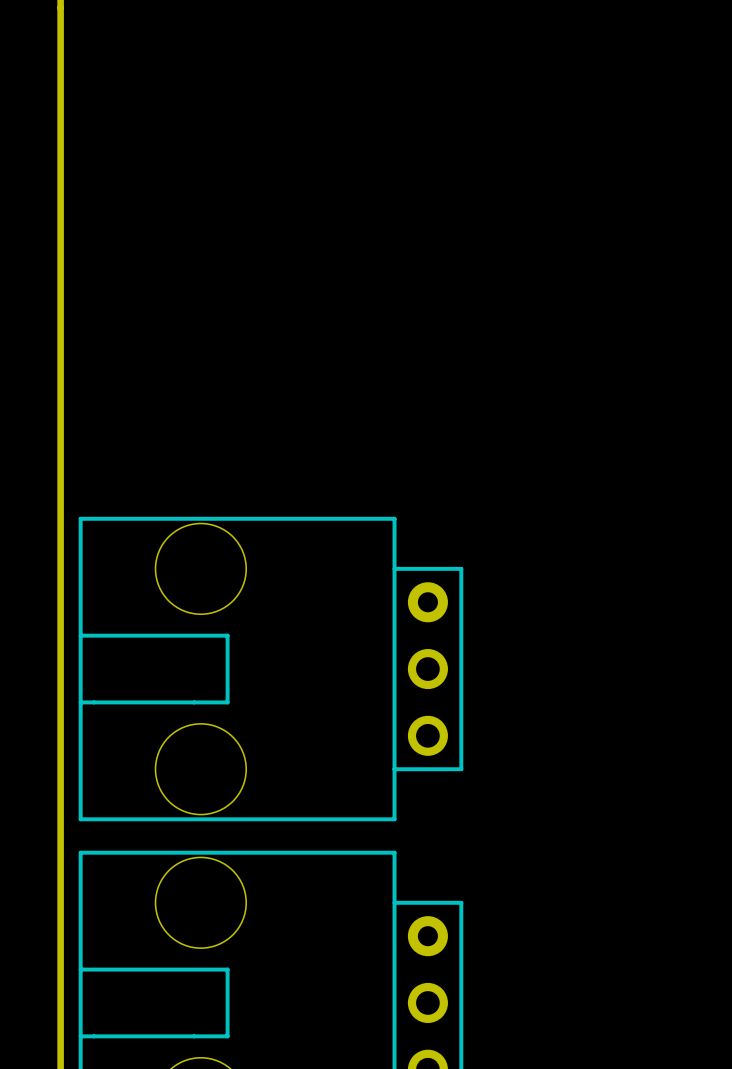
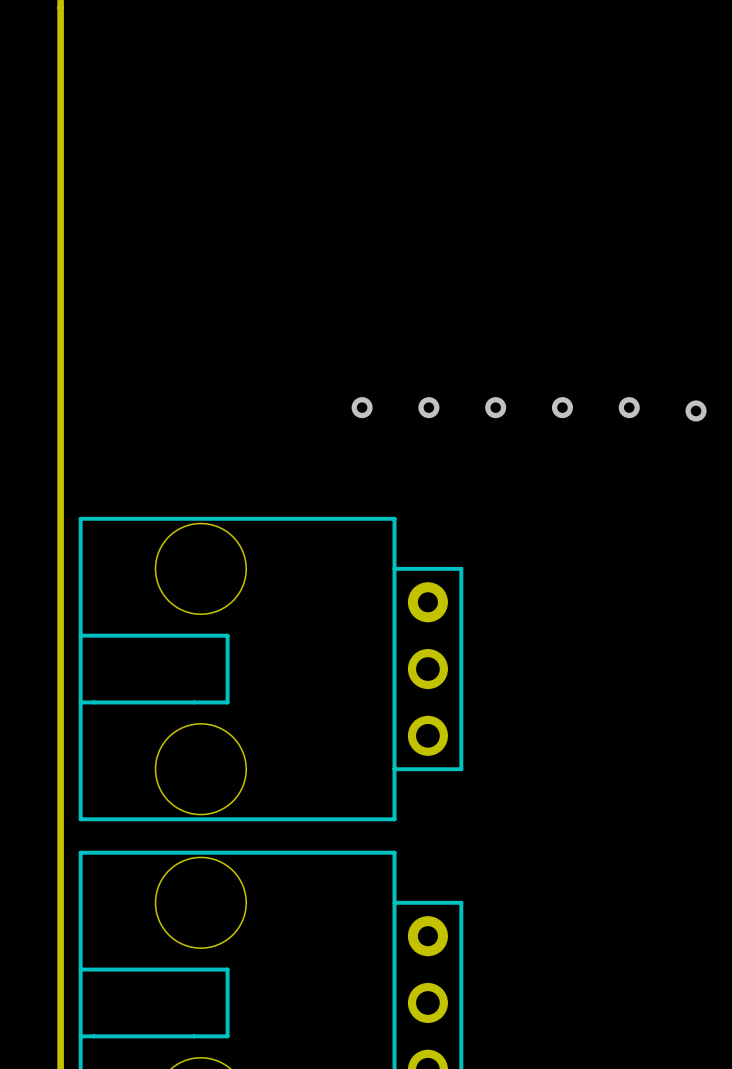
via: none -> (362, 407)
via: none -> (428, 407)
via: none -> (495, 407)
via: none -> (562, 407)
via: none -> (629, 407)
via: none -> (696, 410)

